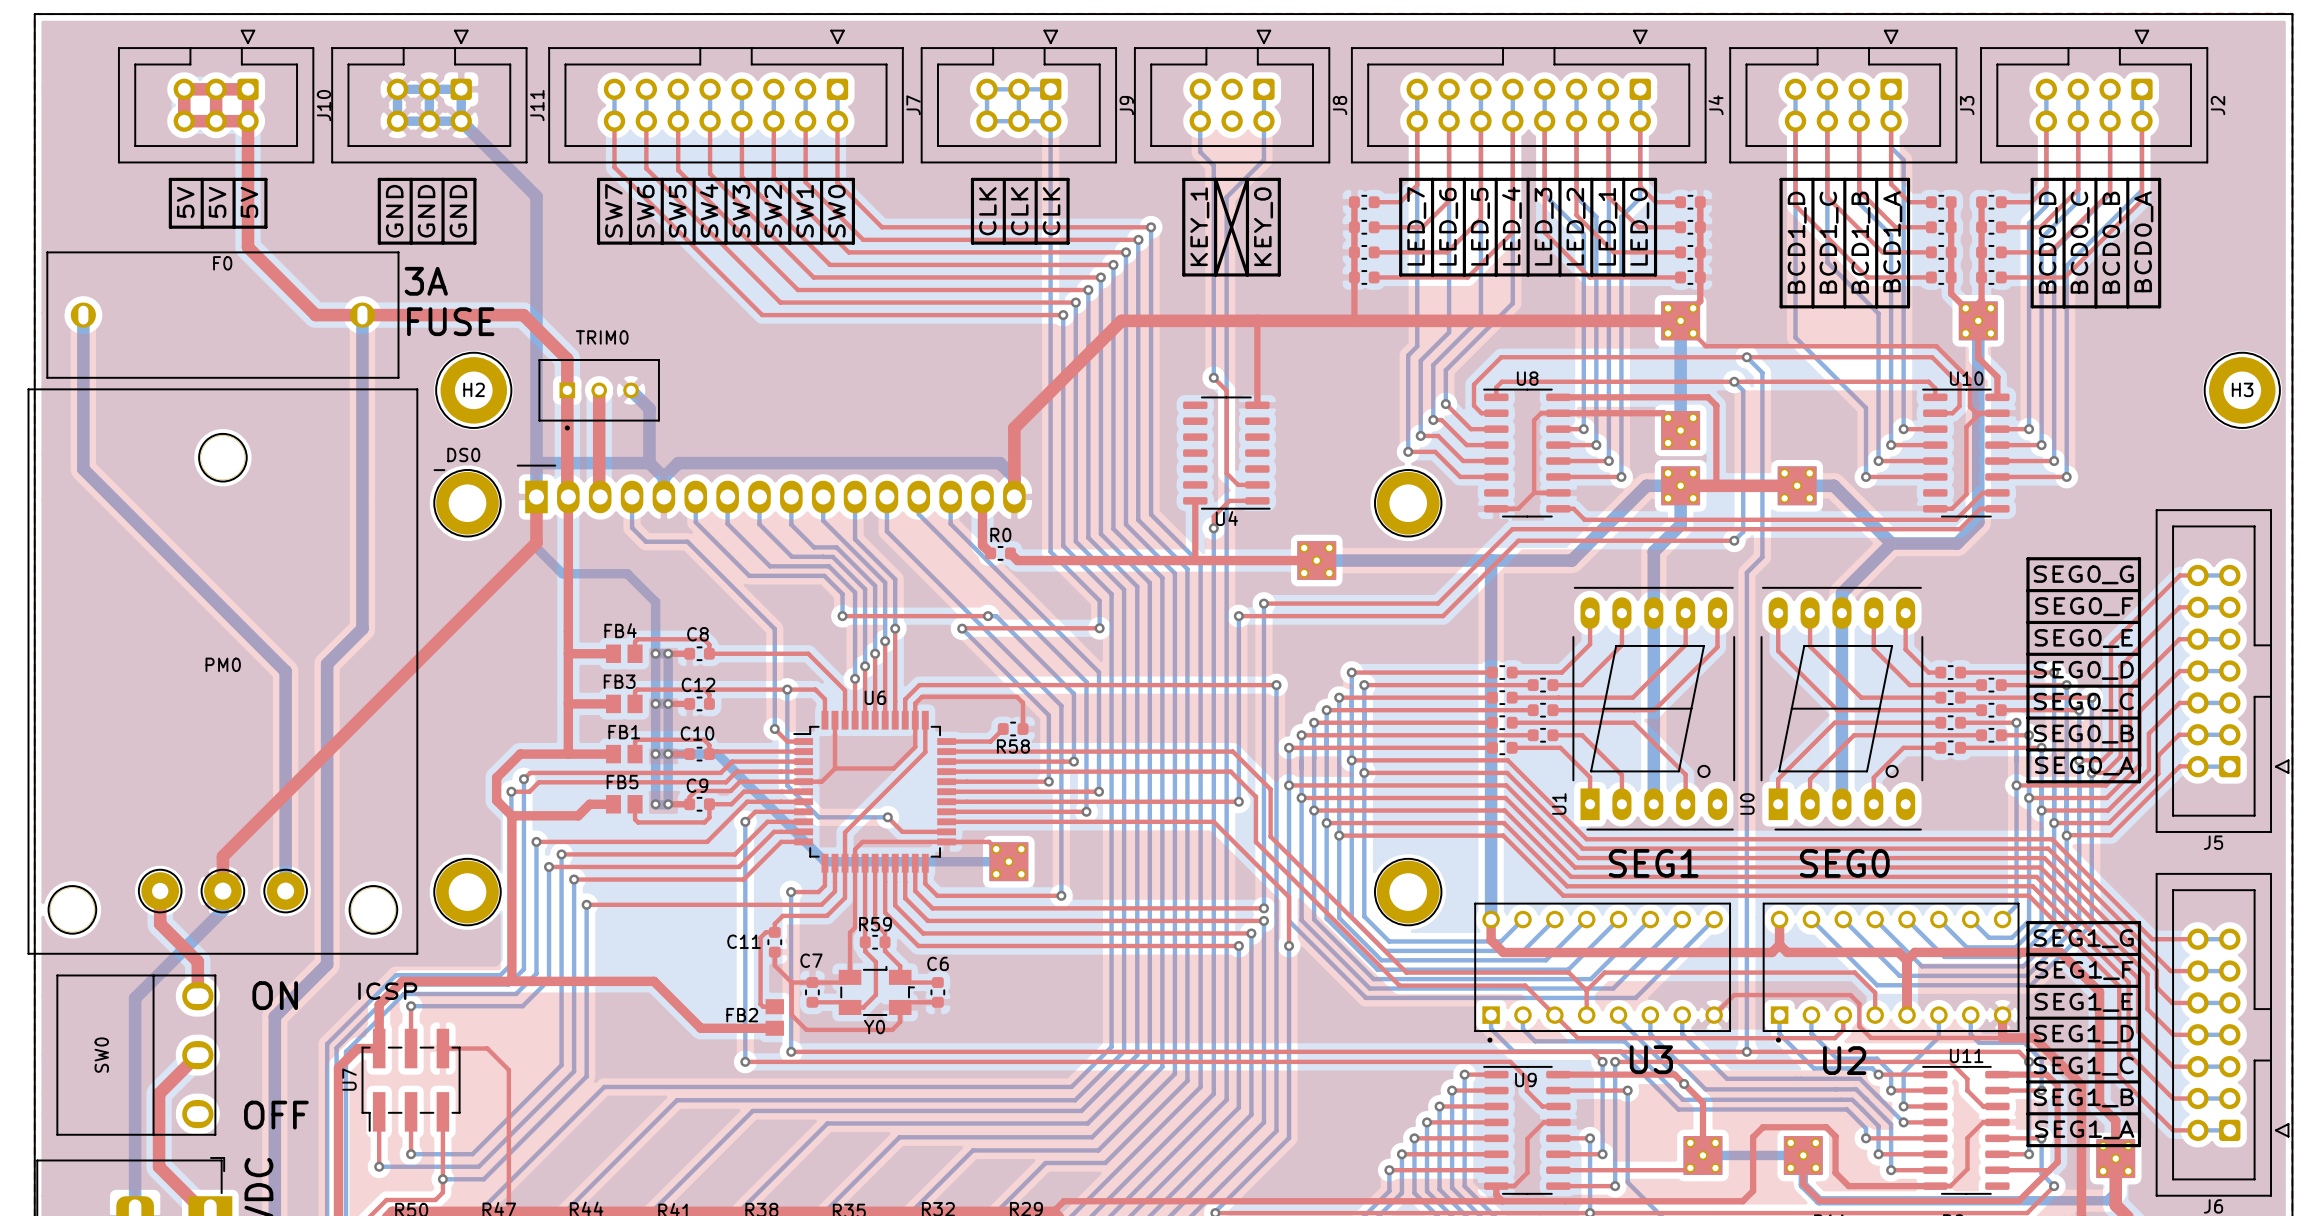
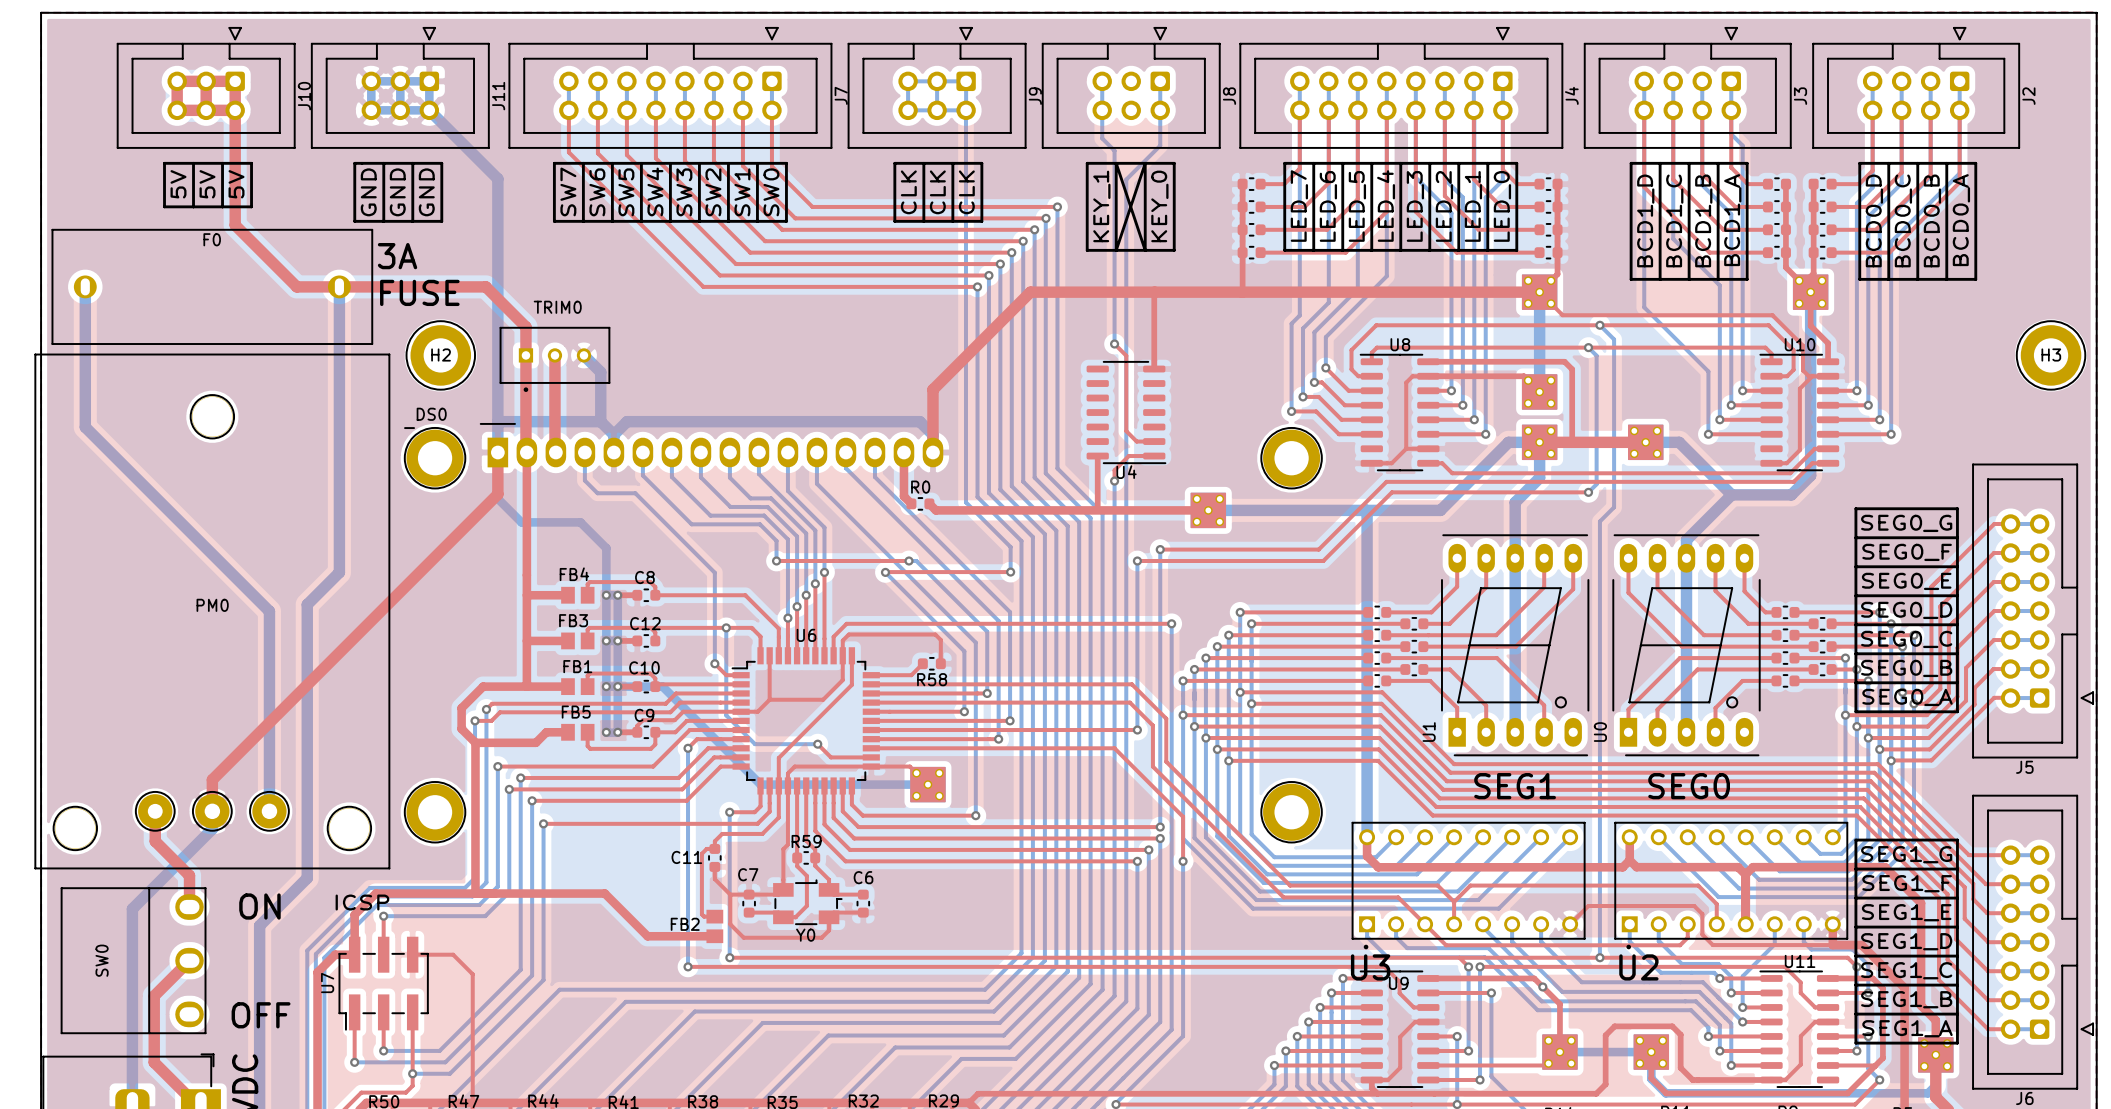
U3 name position: U3 (1651, 1059) -> U3 (1370, 967)
U2 name position: U2 (1844, 1060) -> U2 (1638, 967)

